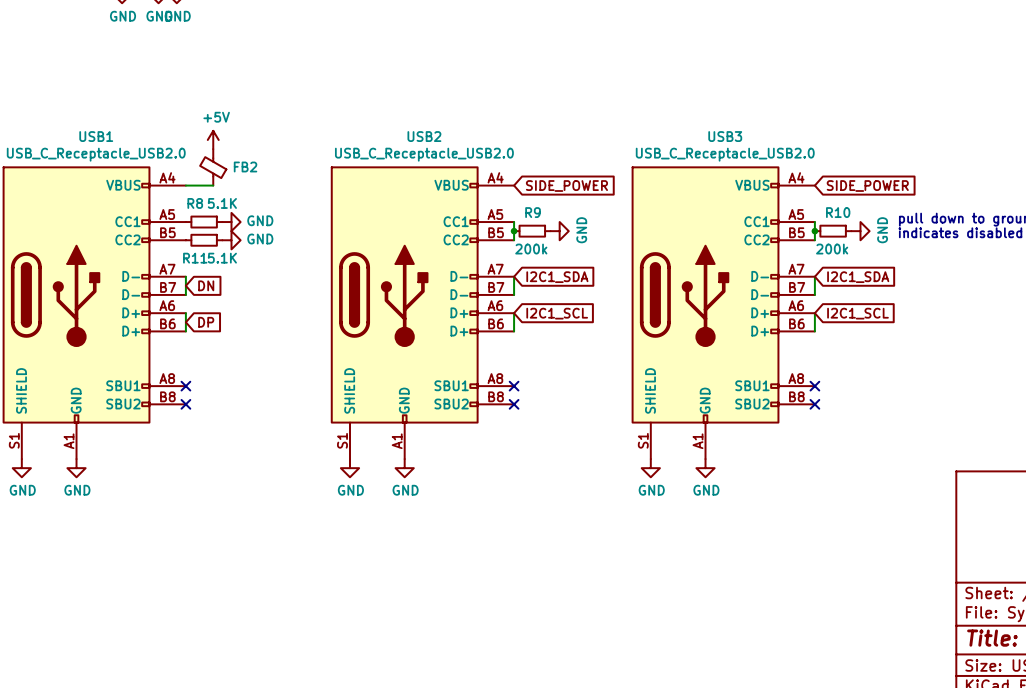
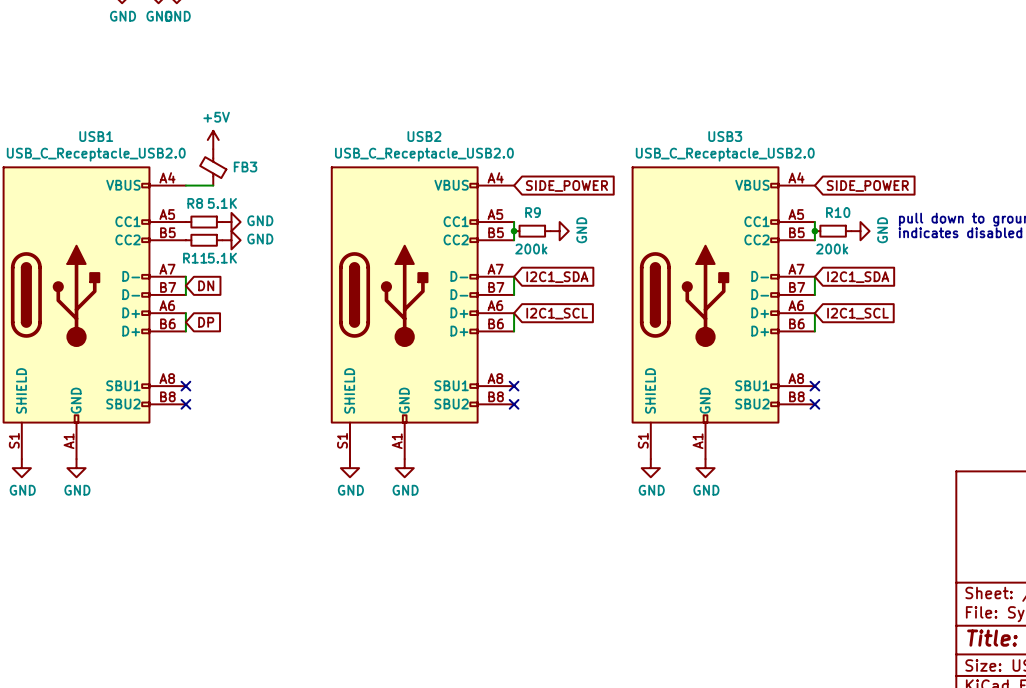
FB2 name: FB2 (245, 166) -> FB3 (245, 166)

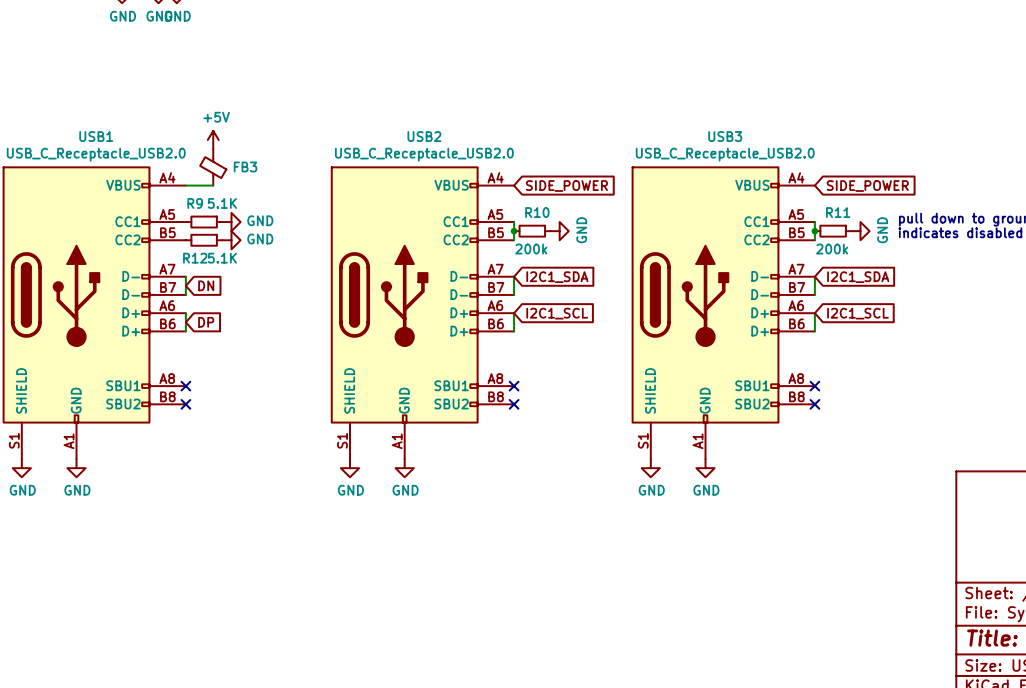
R8 name: R8 (195, 203) -> R9 (195, 203)
R9 name: R9 (533, 212) -> R10 (537, 212)
R10 name: R10 (838, 212) -> R11 (838, 212)
R11 name: R11 (195, 258) -> R12 (195, 258)

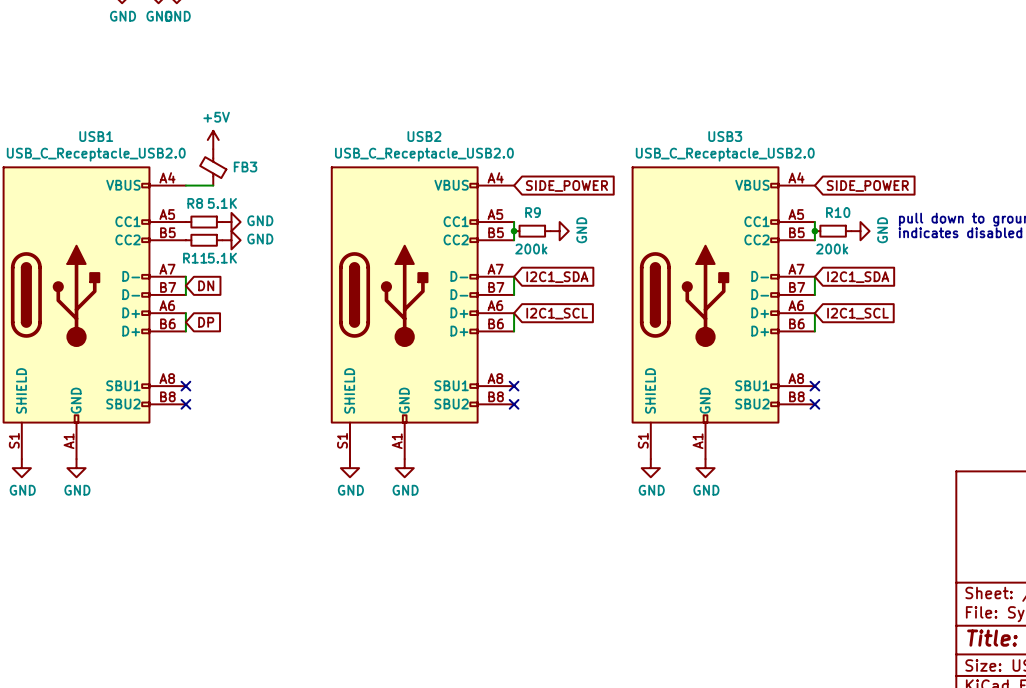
R9 name: R9 (195, 203) -> R8 (195, 203)
R10 name: R10 (537, 212) -> R9 (533, 212)
R11 name: R11 (838, 212) -> R10 (838, 212)
R12 name: R12 (195, 258) -> R11 (195, 258)

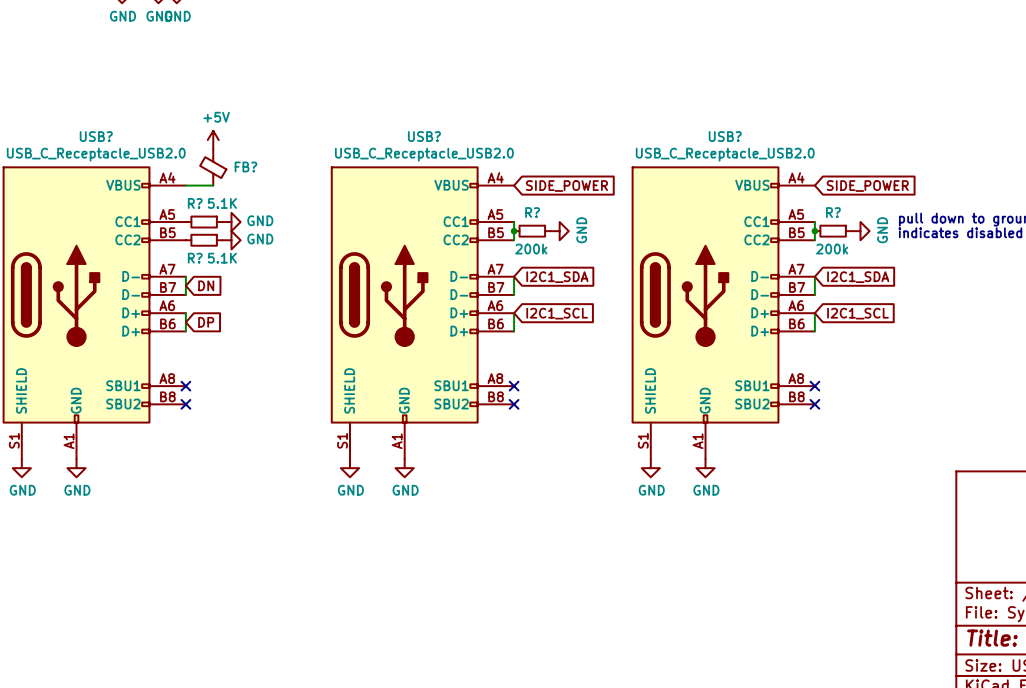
USB1 name: USB1 (96, 136) -> USB? (96, 136)
USB2 name: USB2 (424, 136) -> USB? (424, 136)
USB3 name: USB3 (725, 136) -> USB? (725, 136)
FB3 name: FB3 (245, 166) -> FB? (245, 166)
R8 name: R8 (195, 203) -> R? (195, 203)
R9 name: R9 (533, 212) -> R? (532, 212)
R10 name: R10 (838, 212) -> R? (833, 212)
R11 name: R11 (195, 258) -> R? (195, 258)

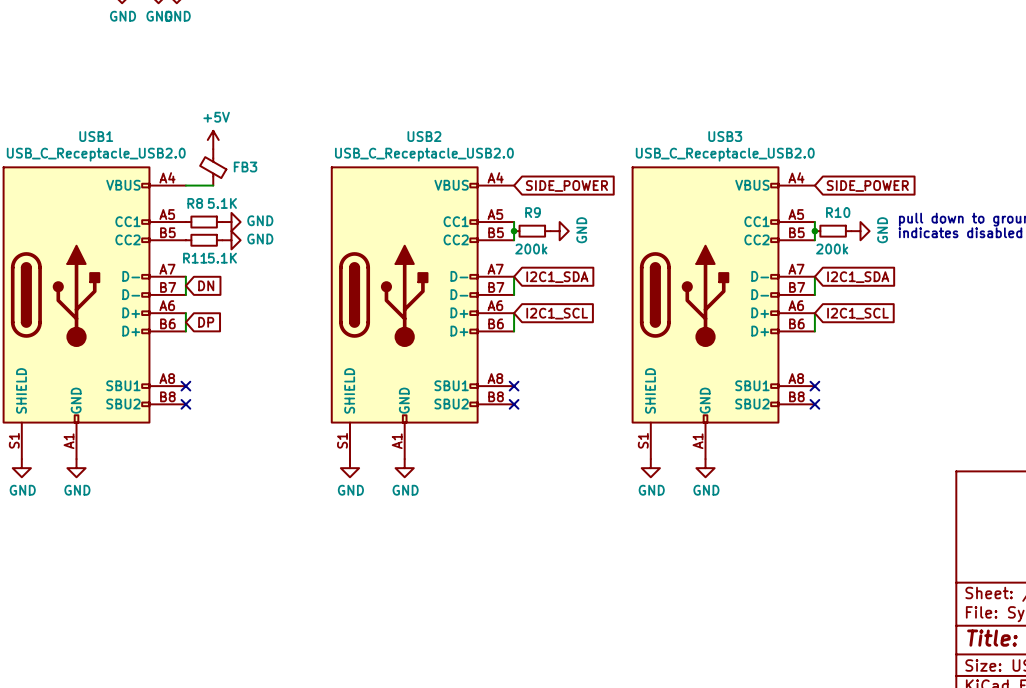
USB? name: USB? (96, 136) -> USB1 (96, 136)
USB? name: USB? (424, 136) -> USB2 (424, 136)
USB? name: USB? (725, 136) -> USB3 (725, 136)
FB? name: FB? (245, 166) -> FB3 (245, 166)
R? name: R? (195, 203) -> R8 (195, 203)
R? name: R? (532, 212) -> R9 (533, 212)
R? name: R? (833, 212) -> R10 (838, 212)
R? name: R? (195, 258) -> R11 (195, 258)

